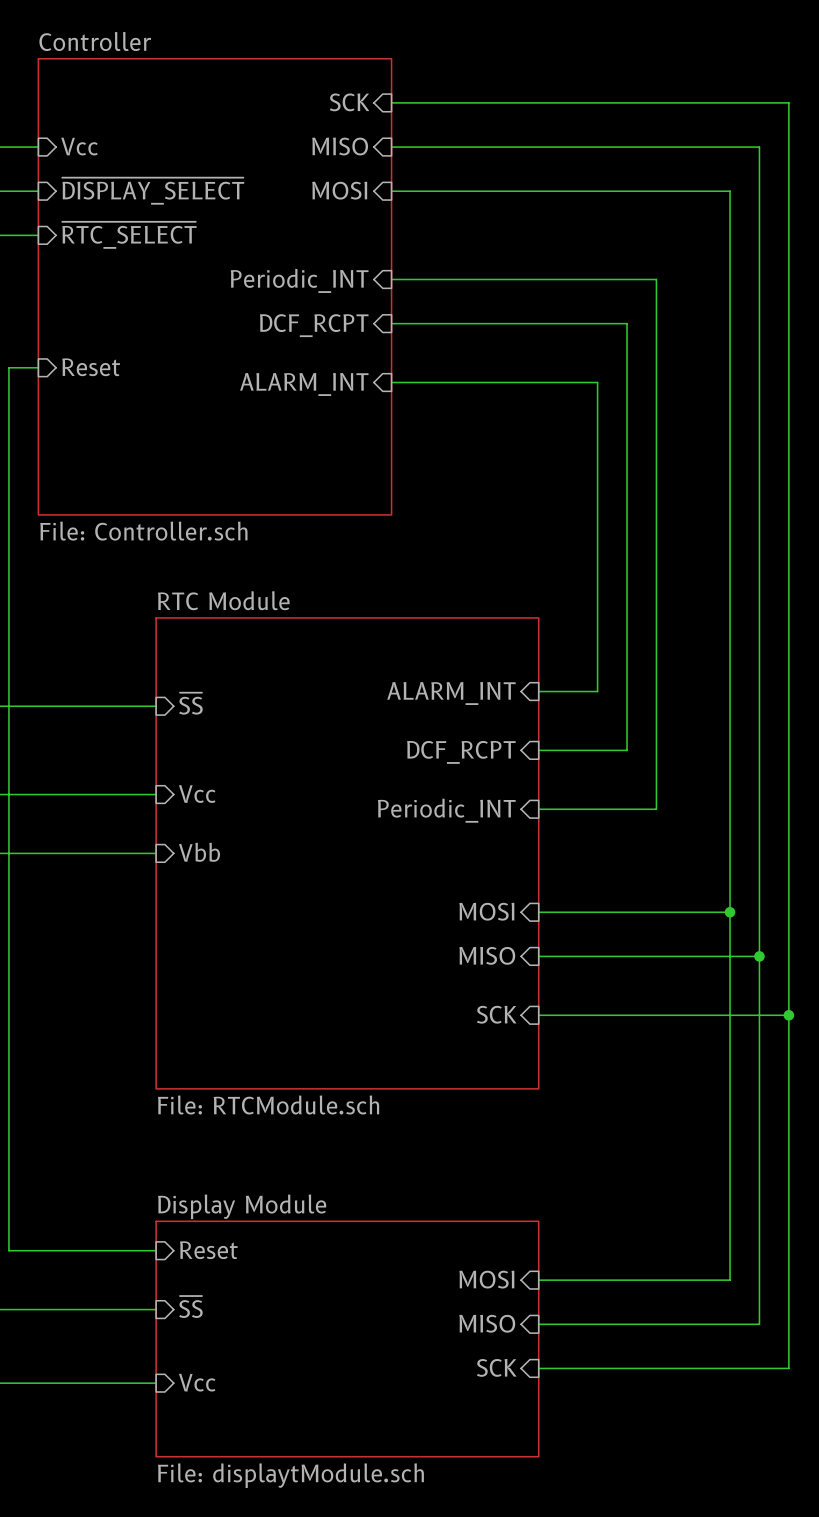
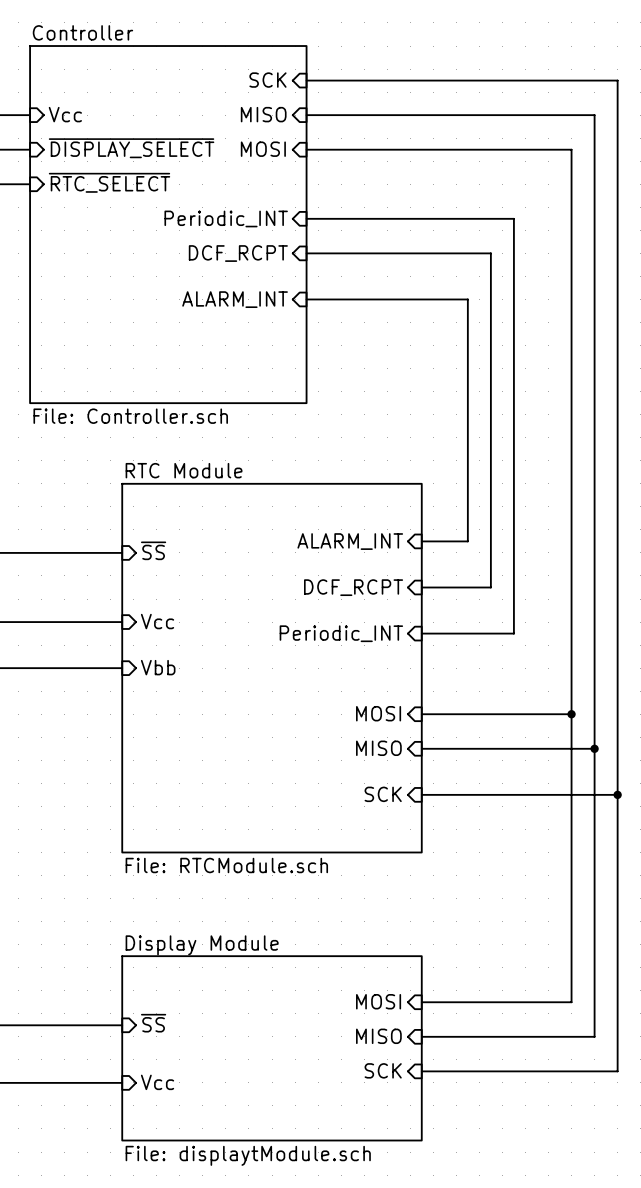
wire: (38, 367) (8, 367) (8, 1250) (156, 1250) -> none
sheet pin: Reset (91, 367) -> none
sheet pin: Reset (208, 1250) -> none

